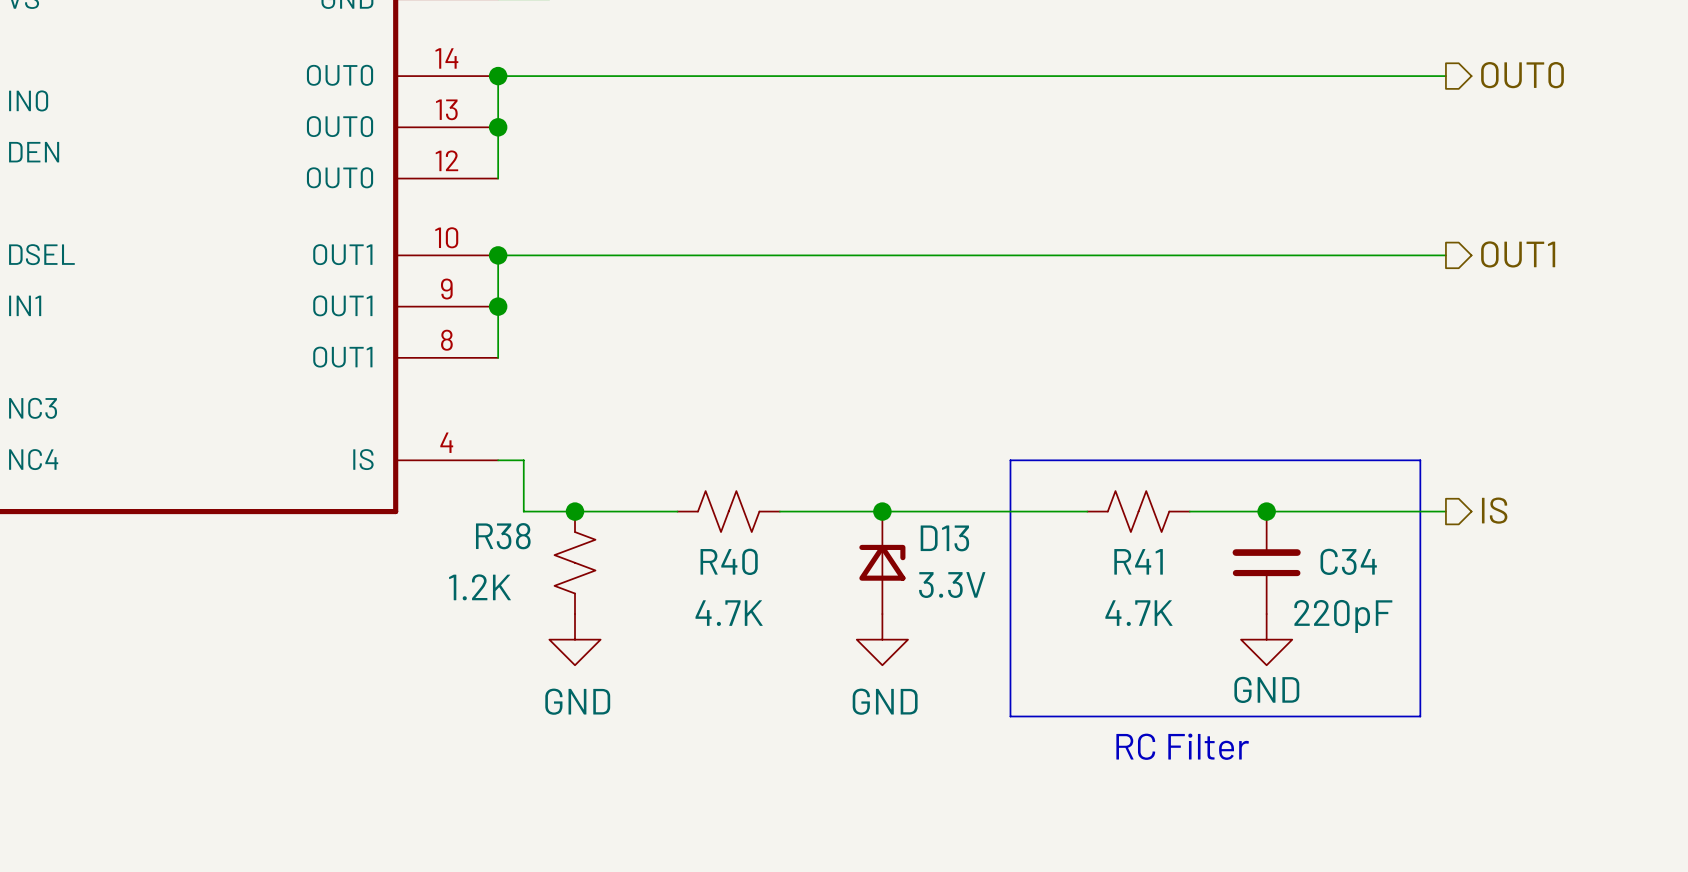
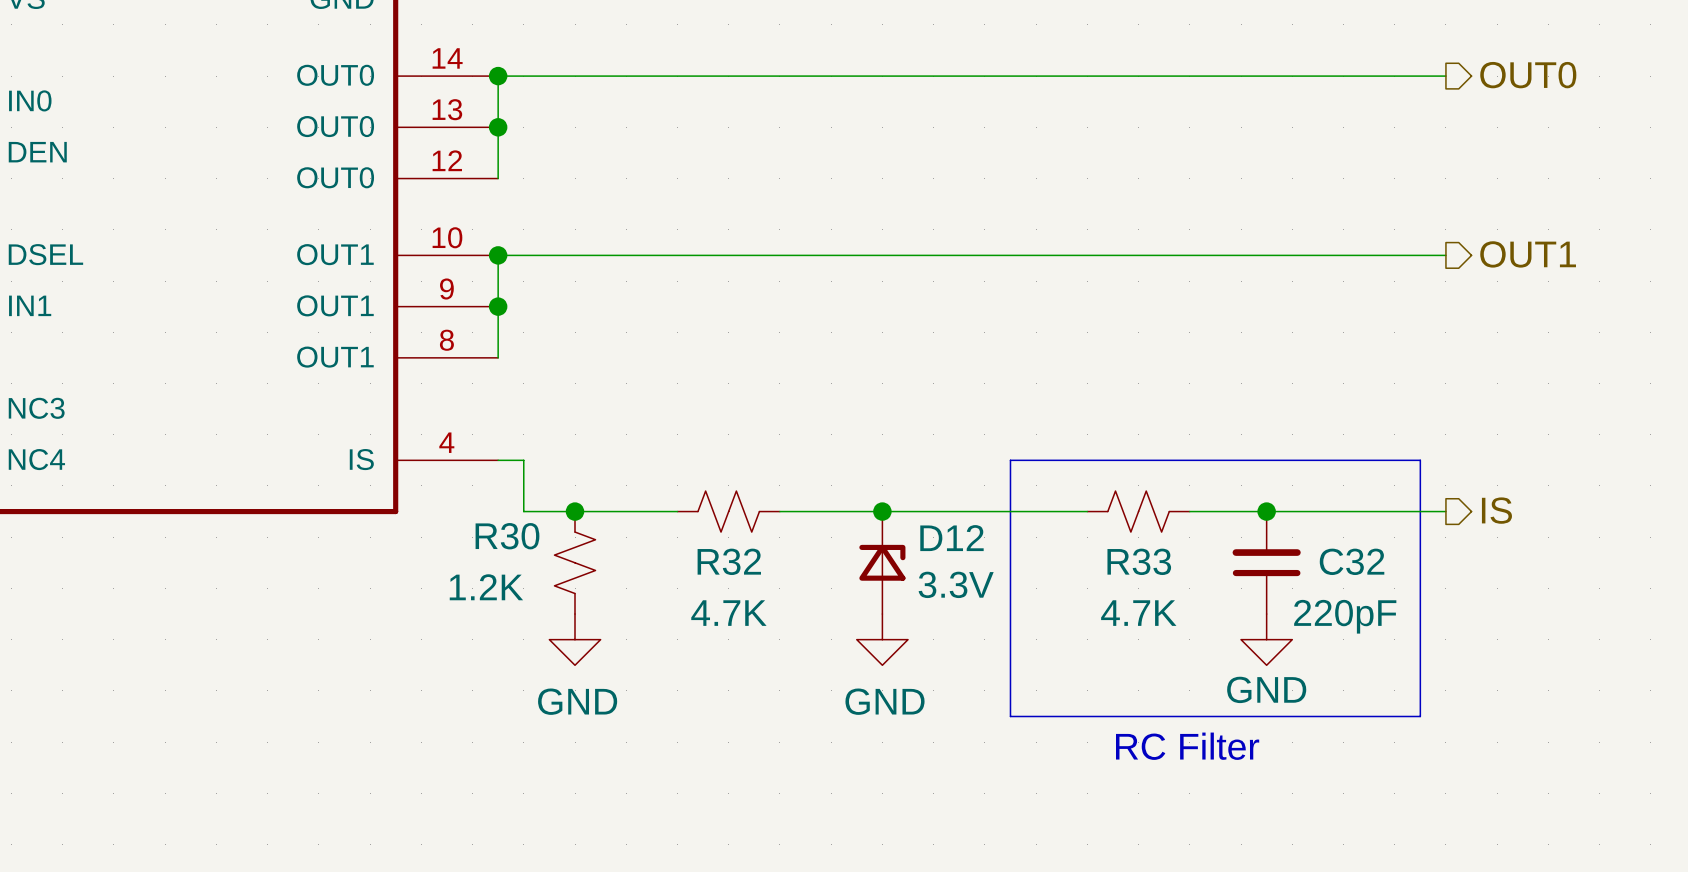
R38 name: R38 (503, 536) -> R30 (507, 536)
D13 name: D13 (944, 538) -> D12 (951, 538)
R40 name: R40 (729, 561) -> R32 (729, 561)
R41 name: R41 (1138, 561) -> R33 (1139, 561)
C34 name: C34 (1348, 561) -> C32 (1352, 561)

